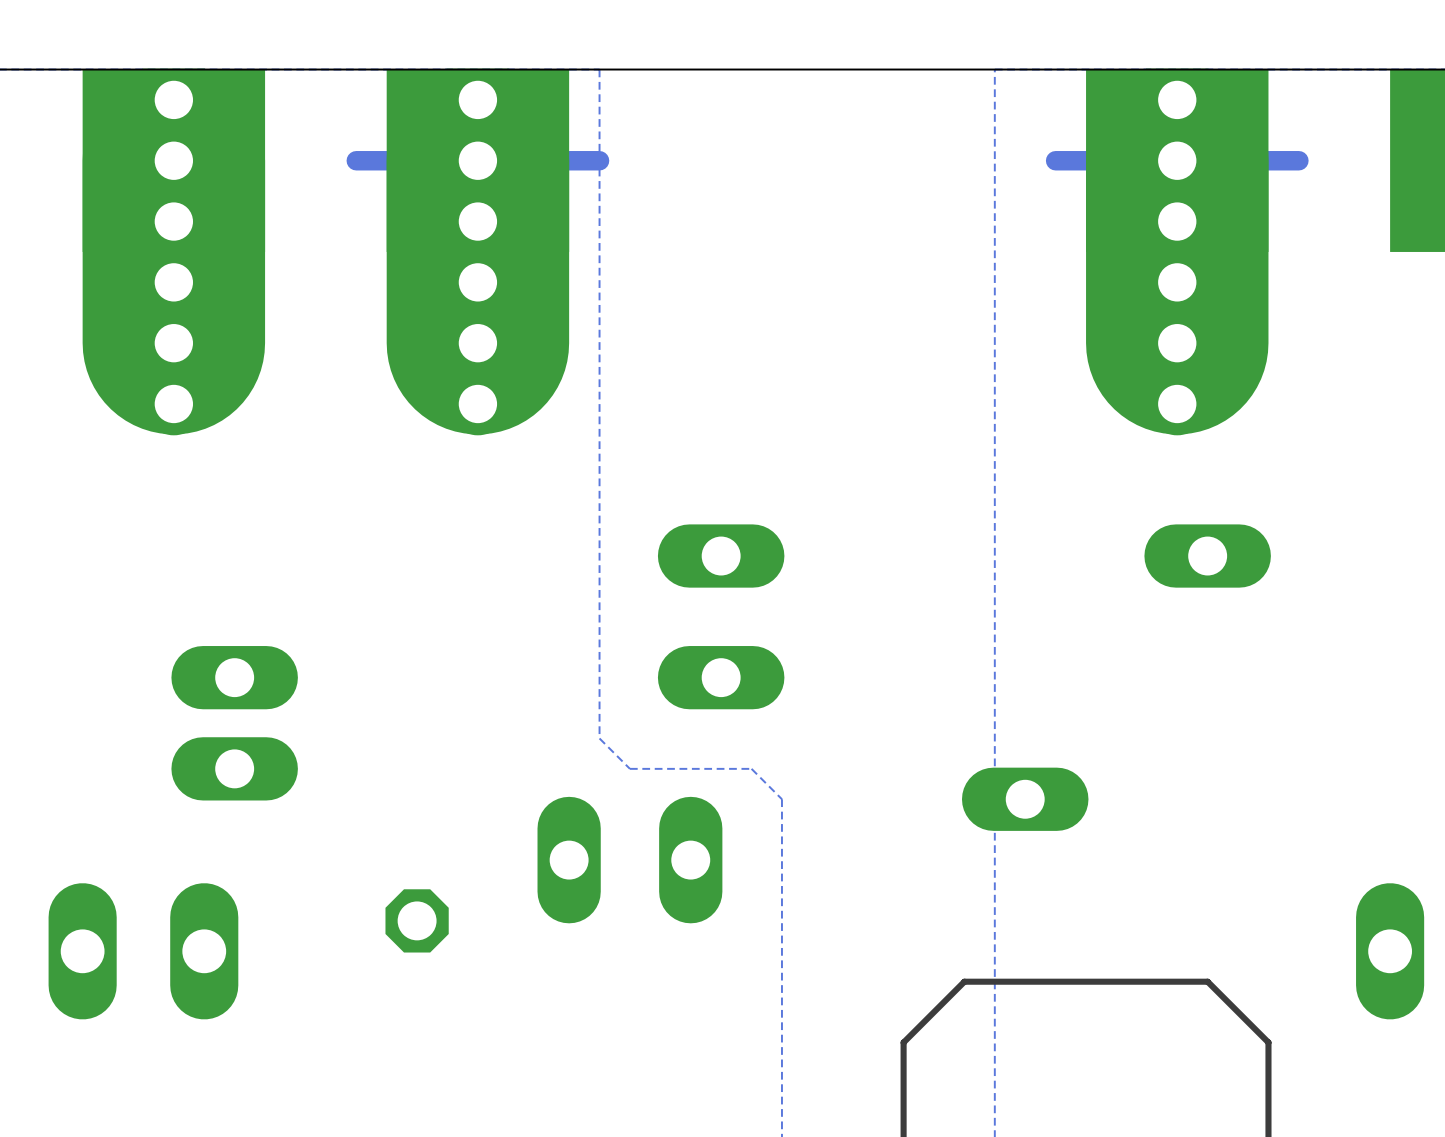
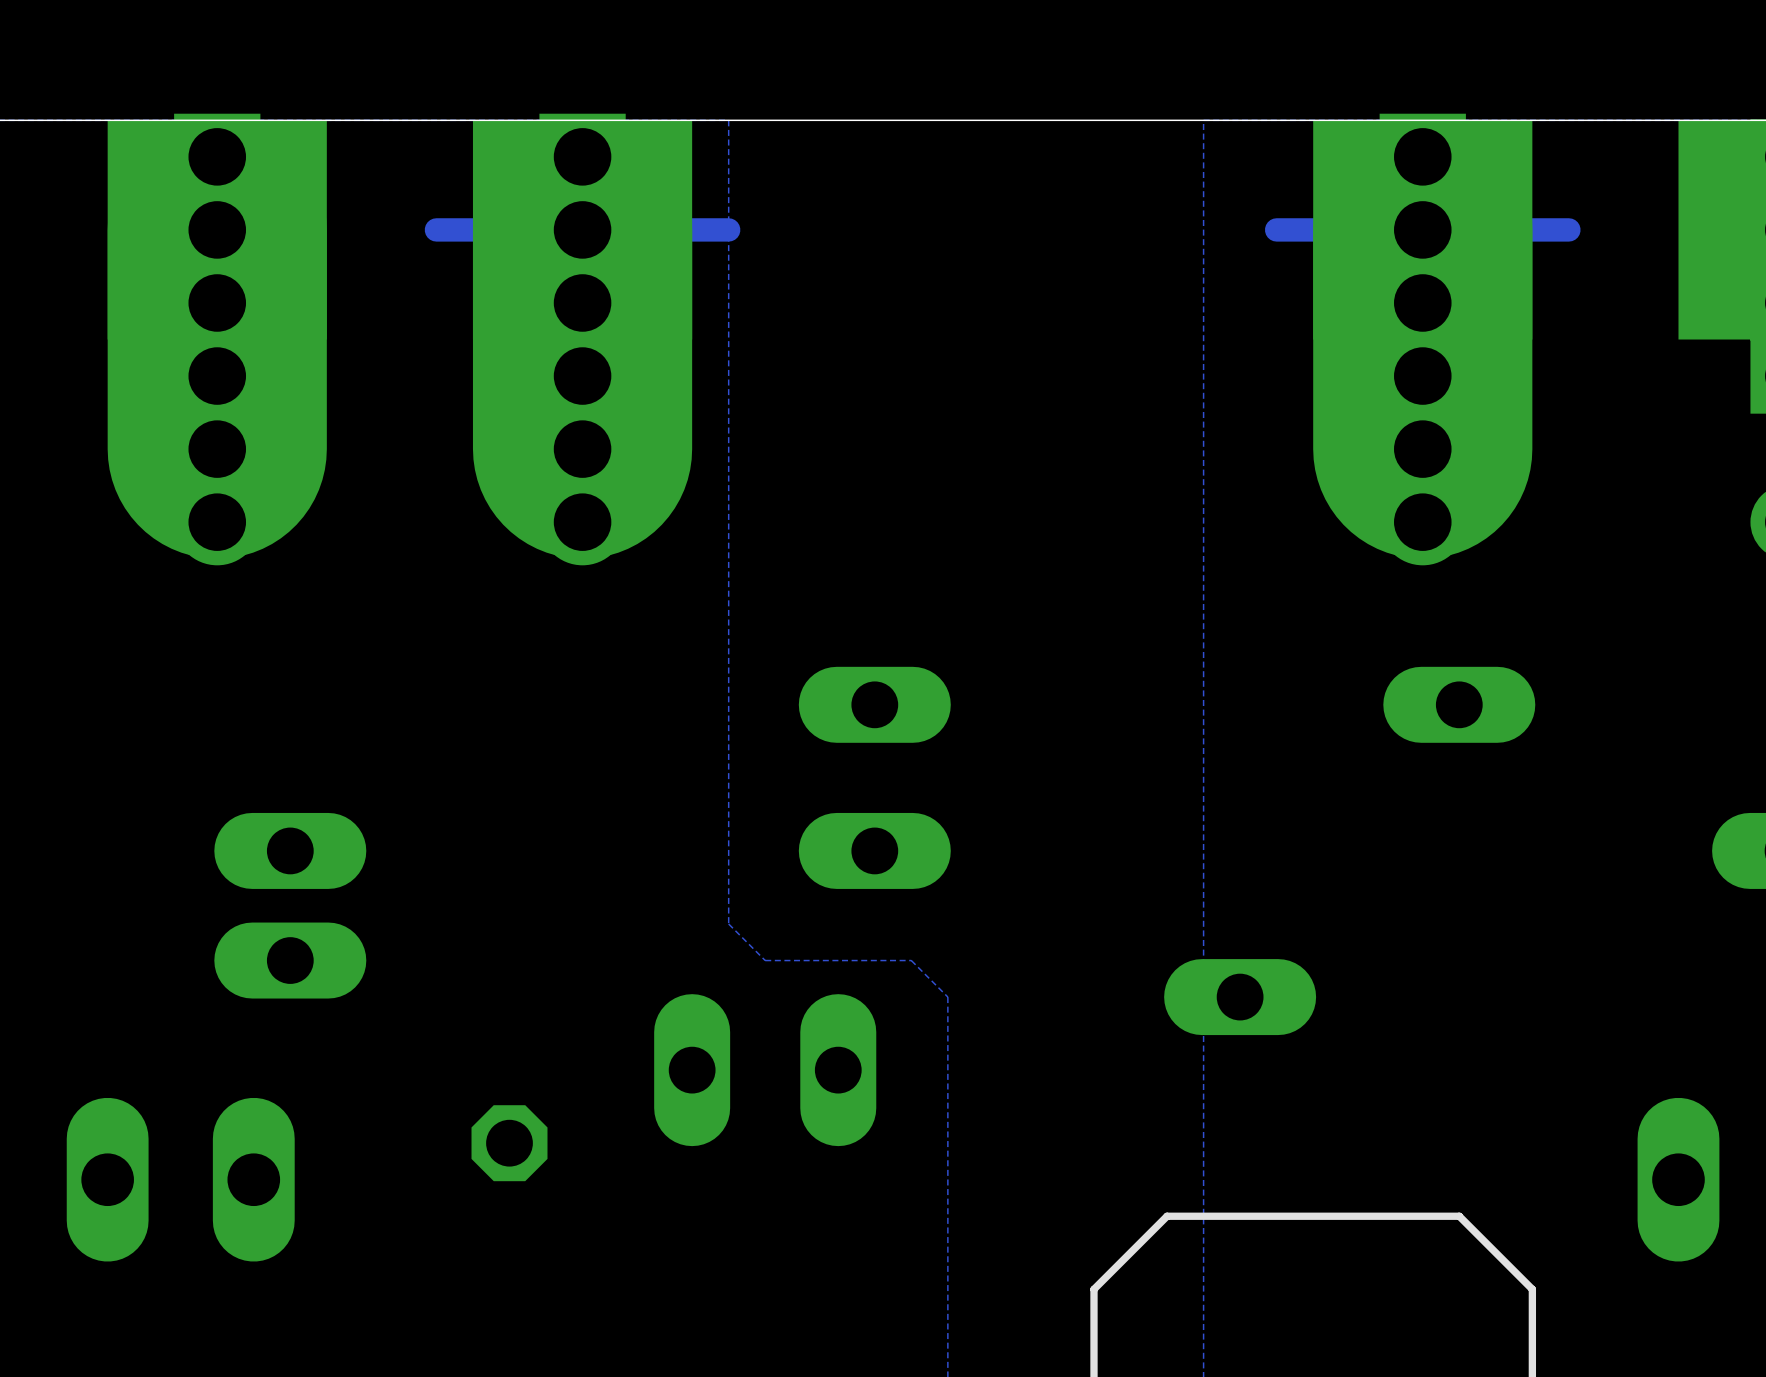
part footprint: [82, 68, 266, 436] -> [107, 113, 327, 566]
part footprint: [386, 68, 570, 436] -> [472, 113, 693, 566]
part footprint: [1086, 68, 1269, 436] -> [1313, 113, 1533, 566]

